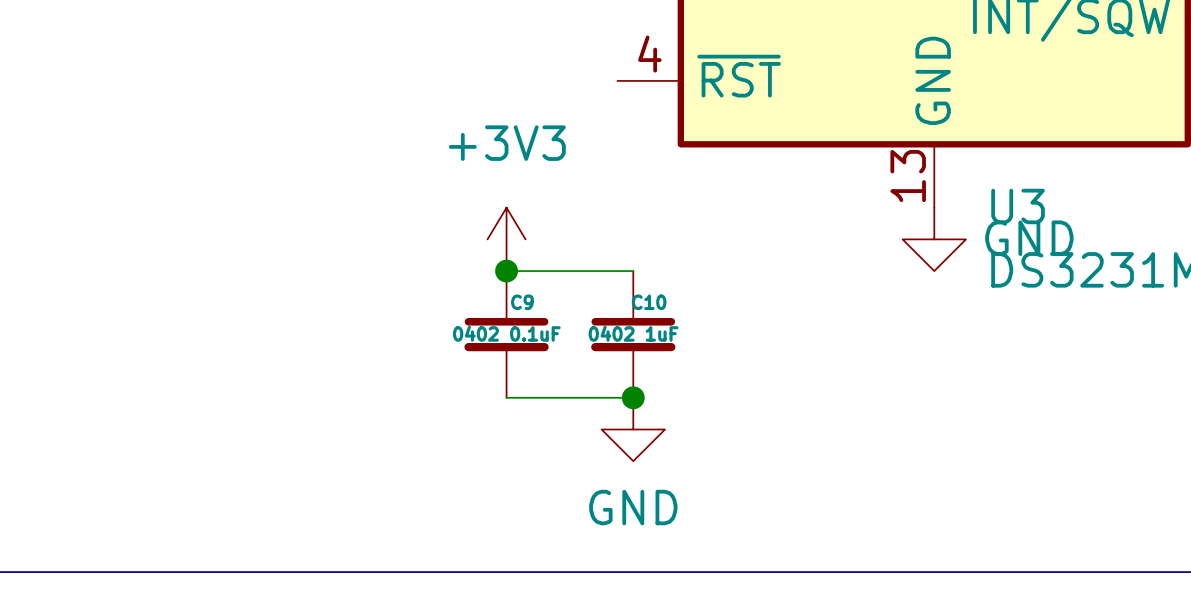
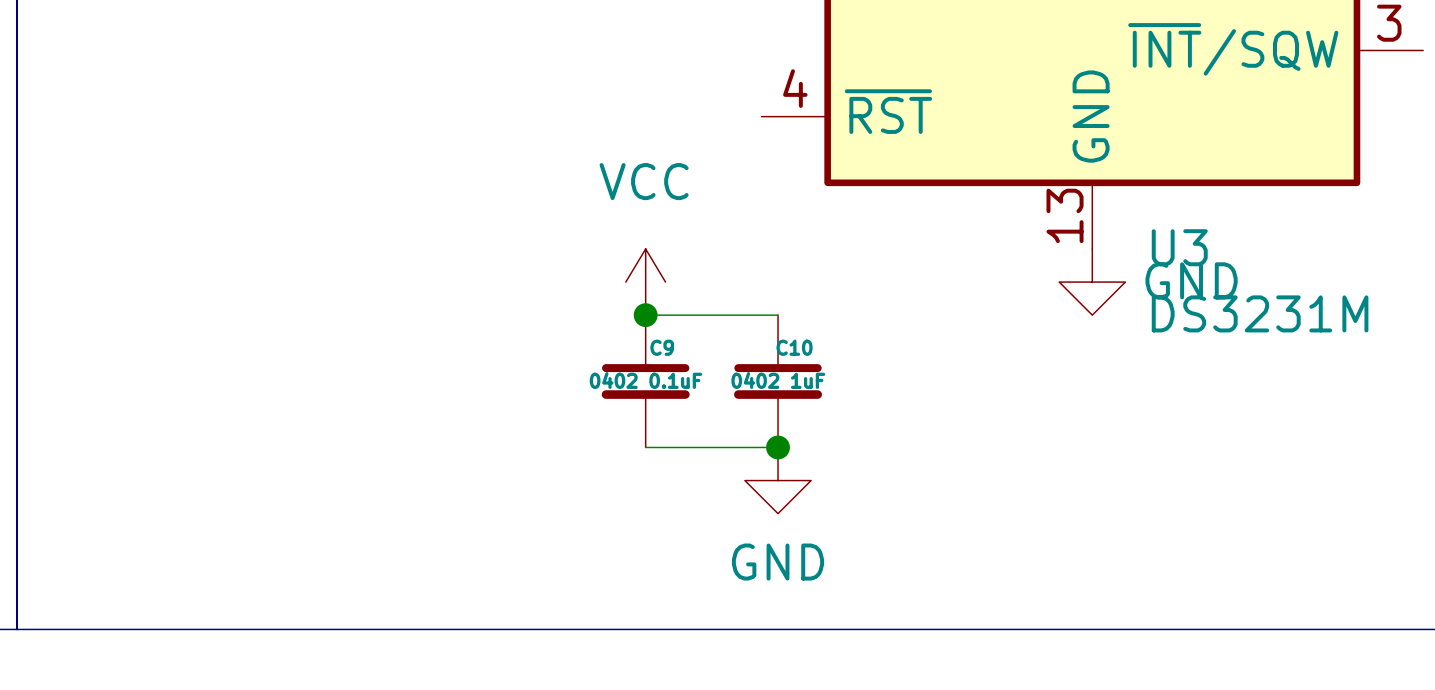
power symbol: +3V3 (506, 239) -> VCC (645, 282)

